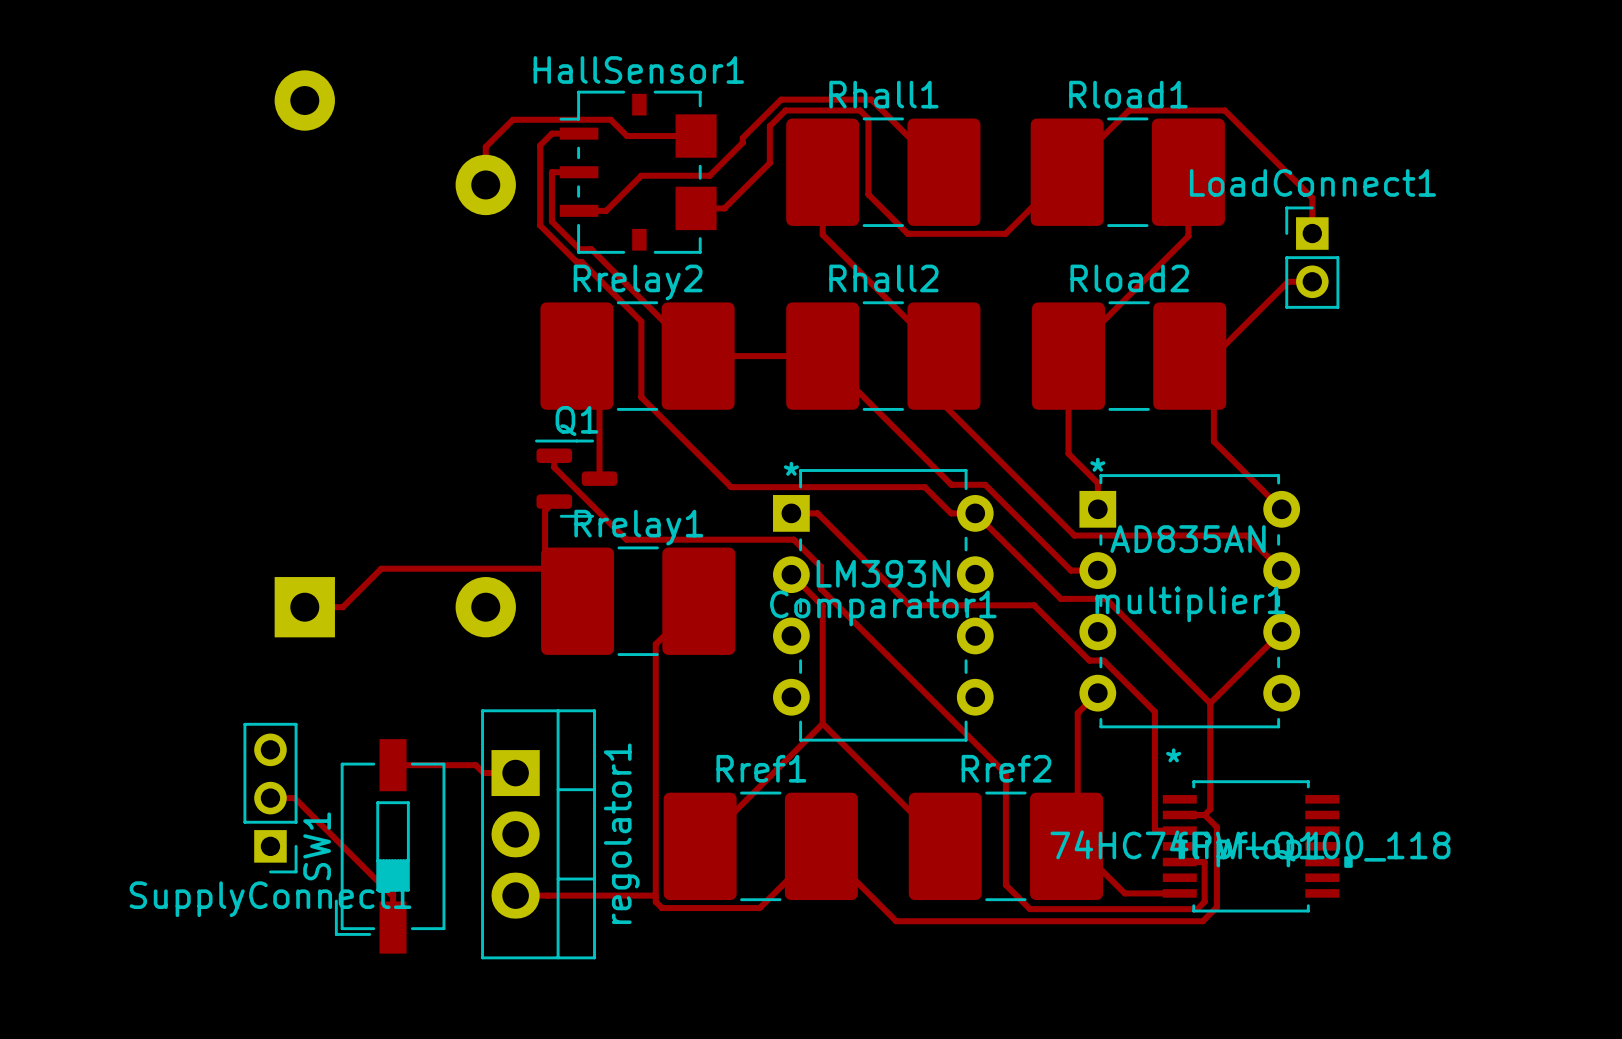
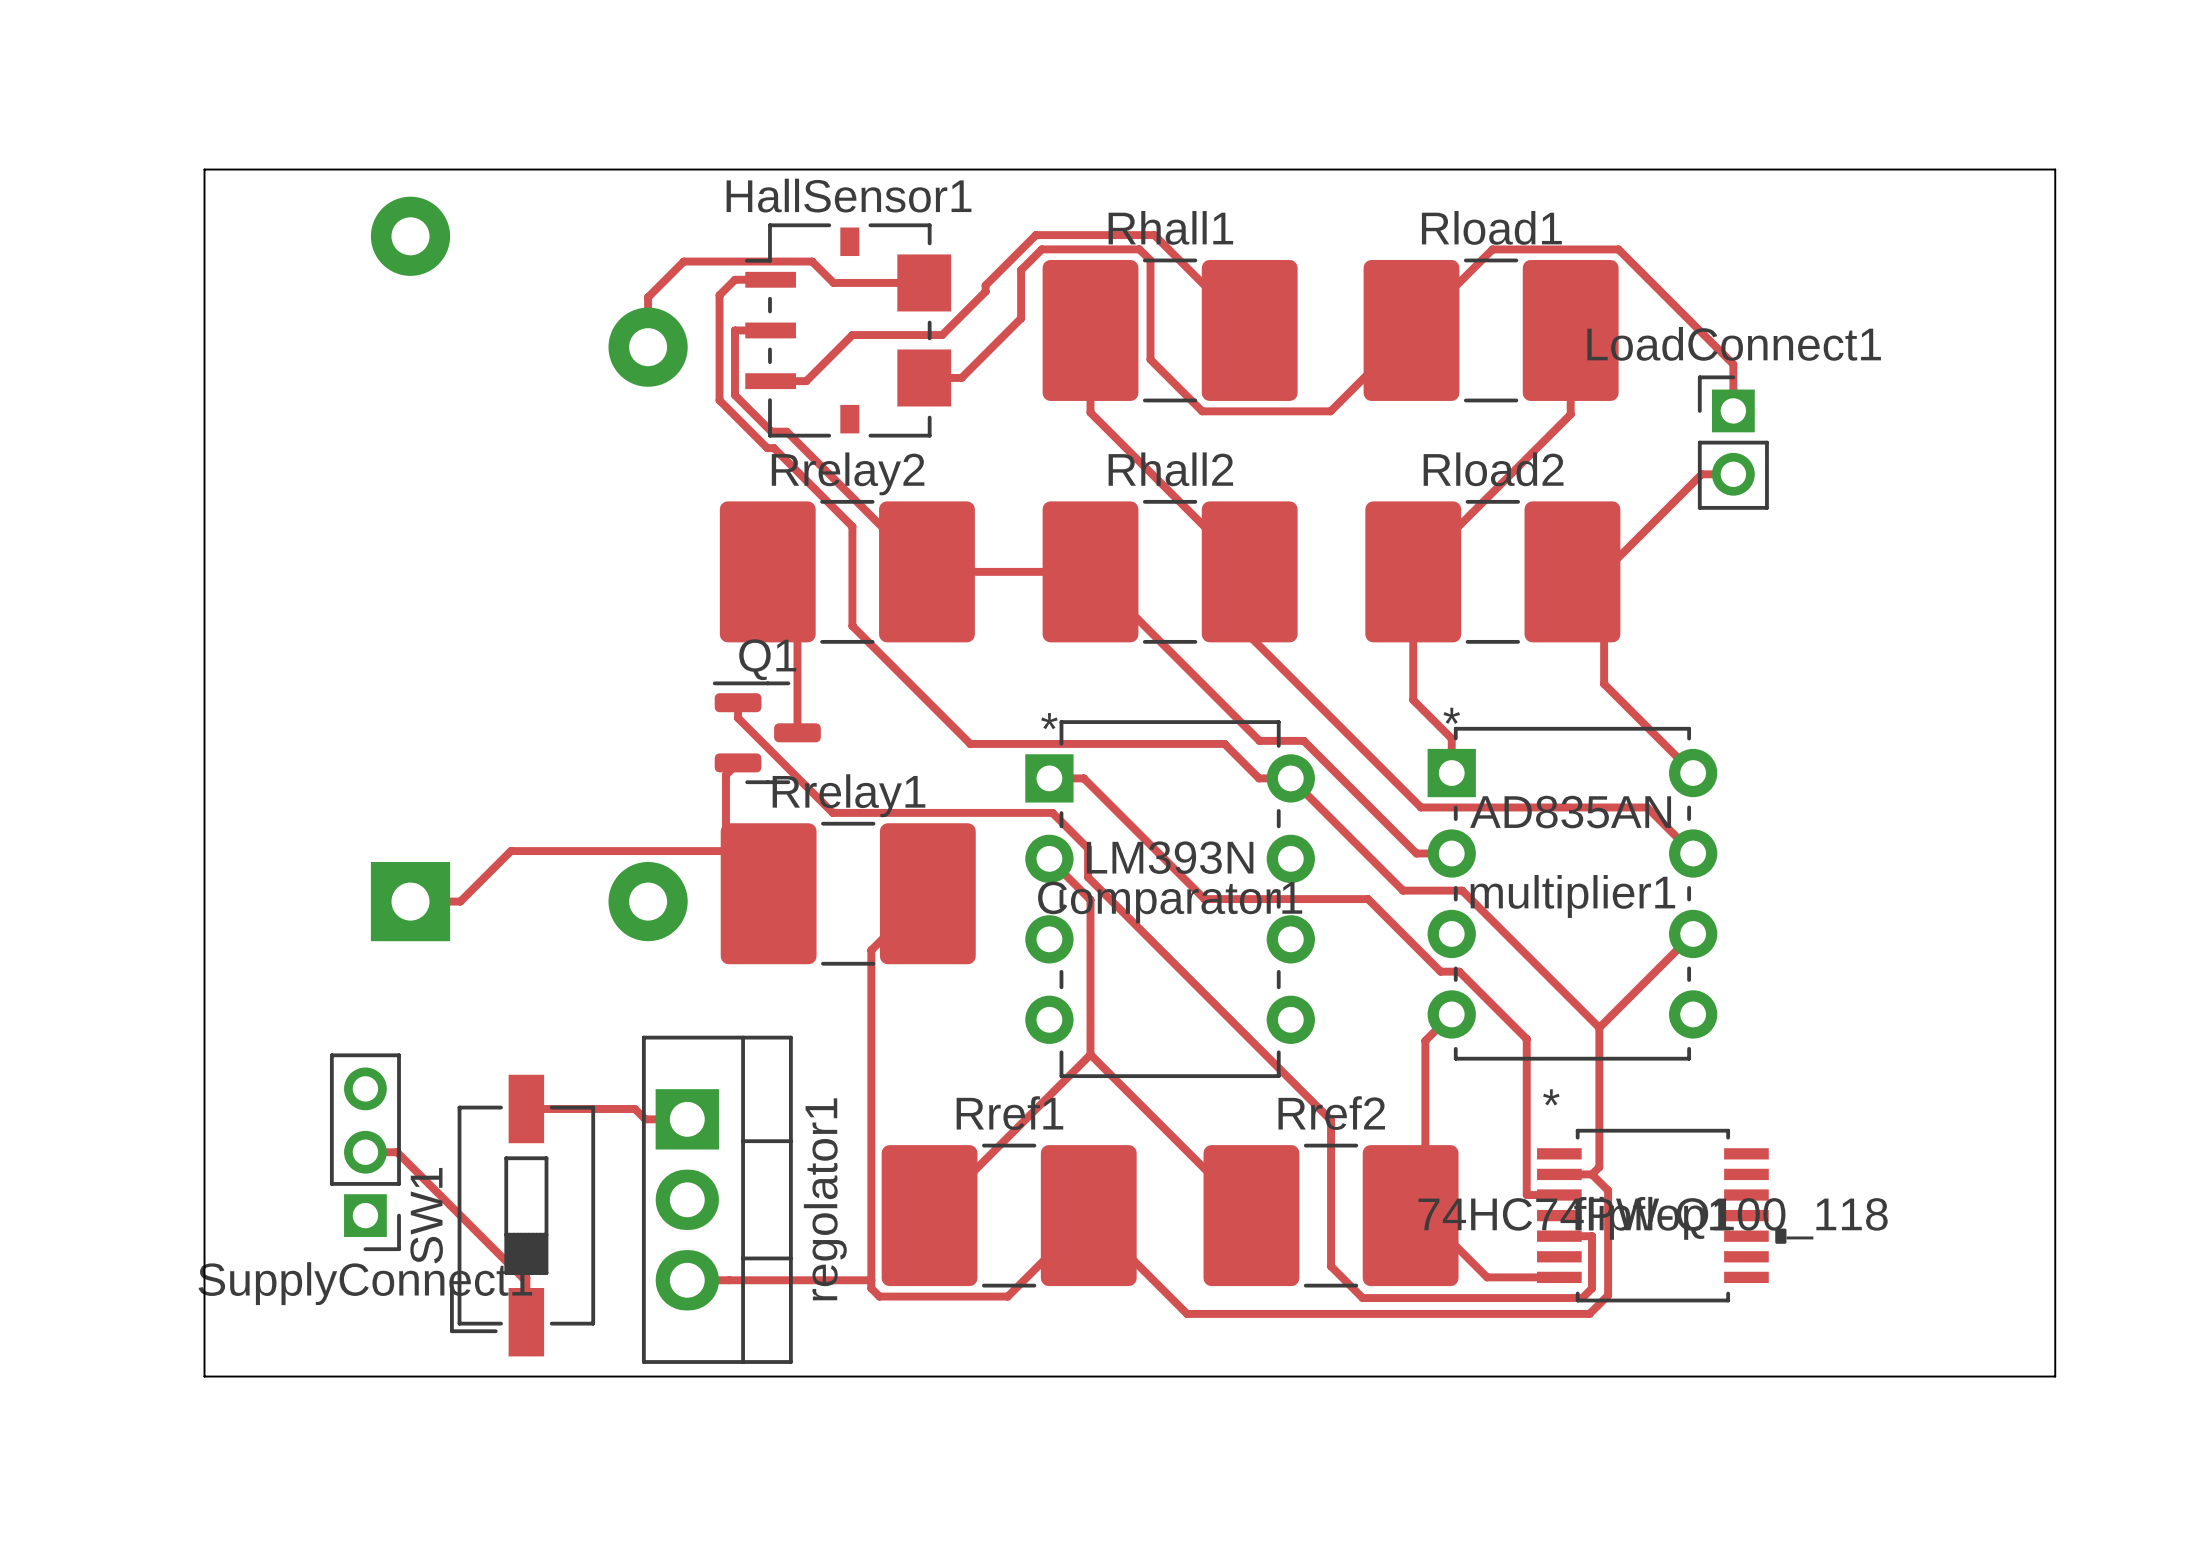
board edge: none -> (204, 169) (2055, 169) (2055, 1376) (204, 1376) (204, 169)

